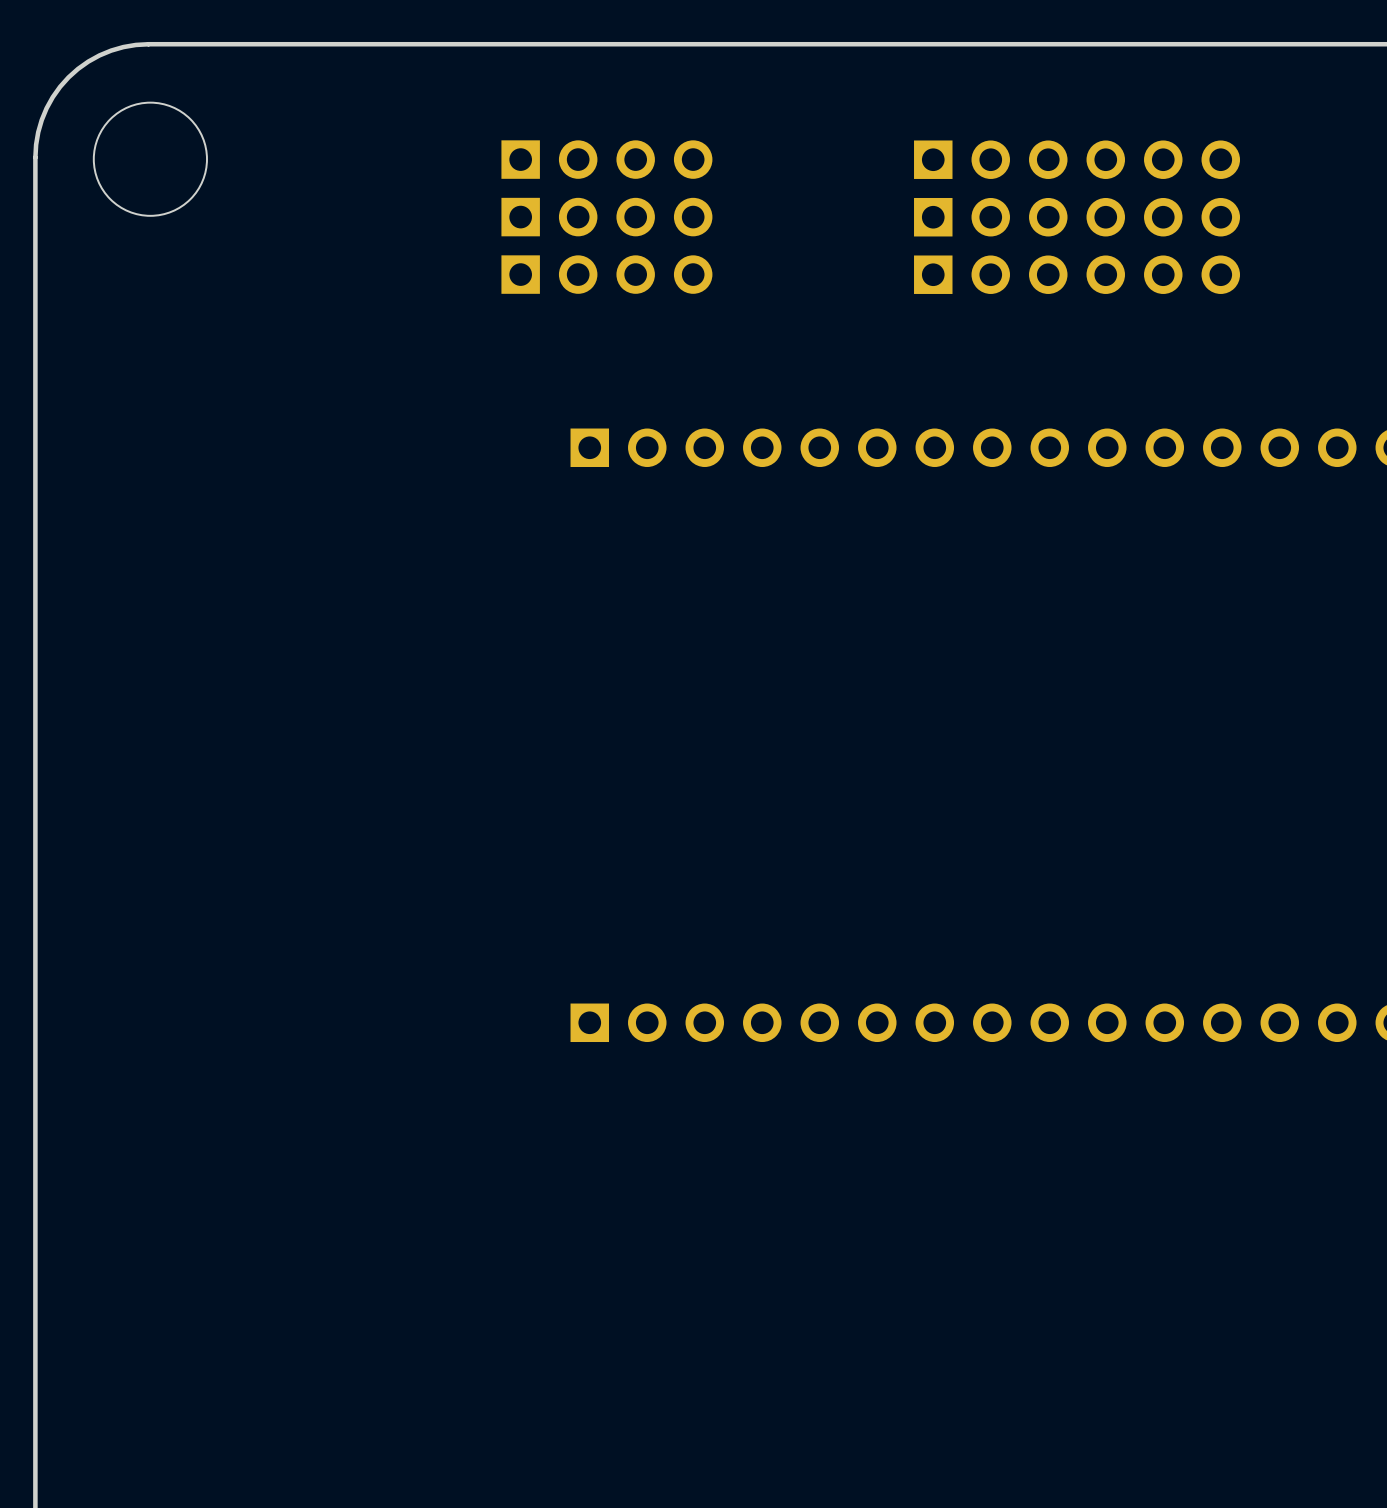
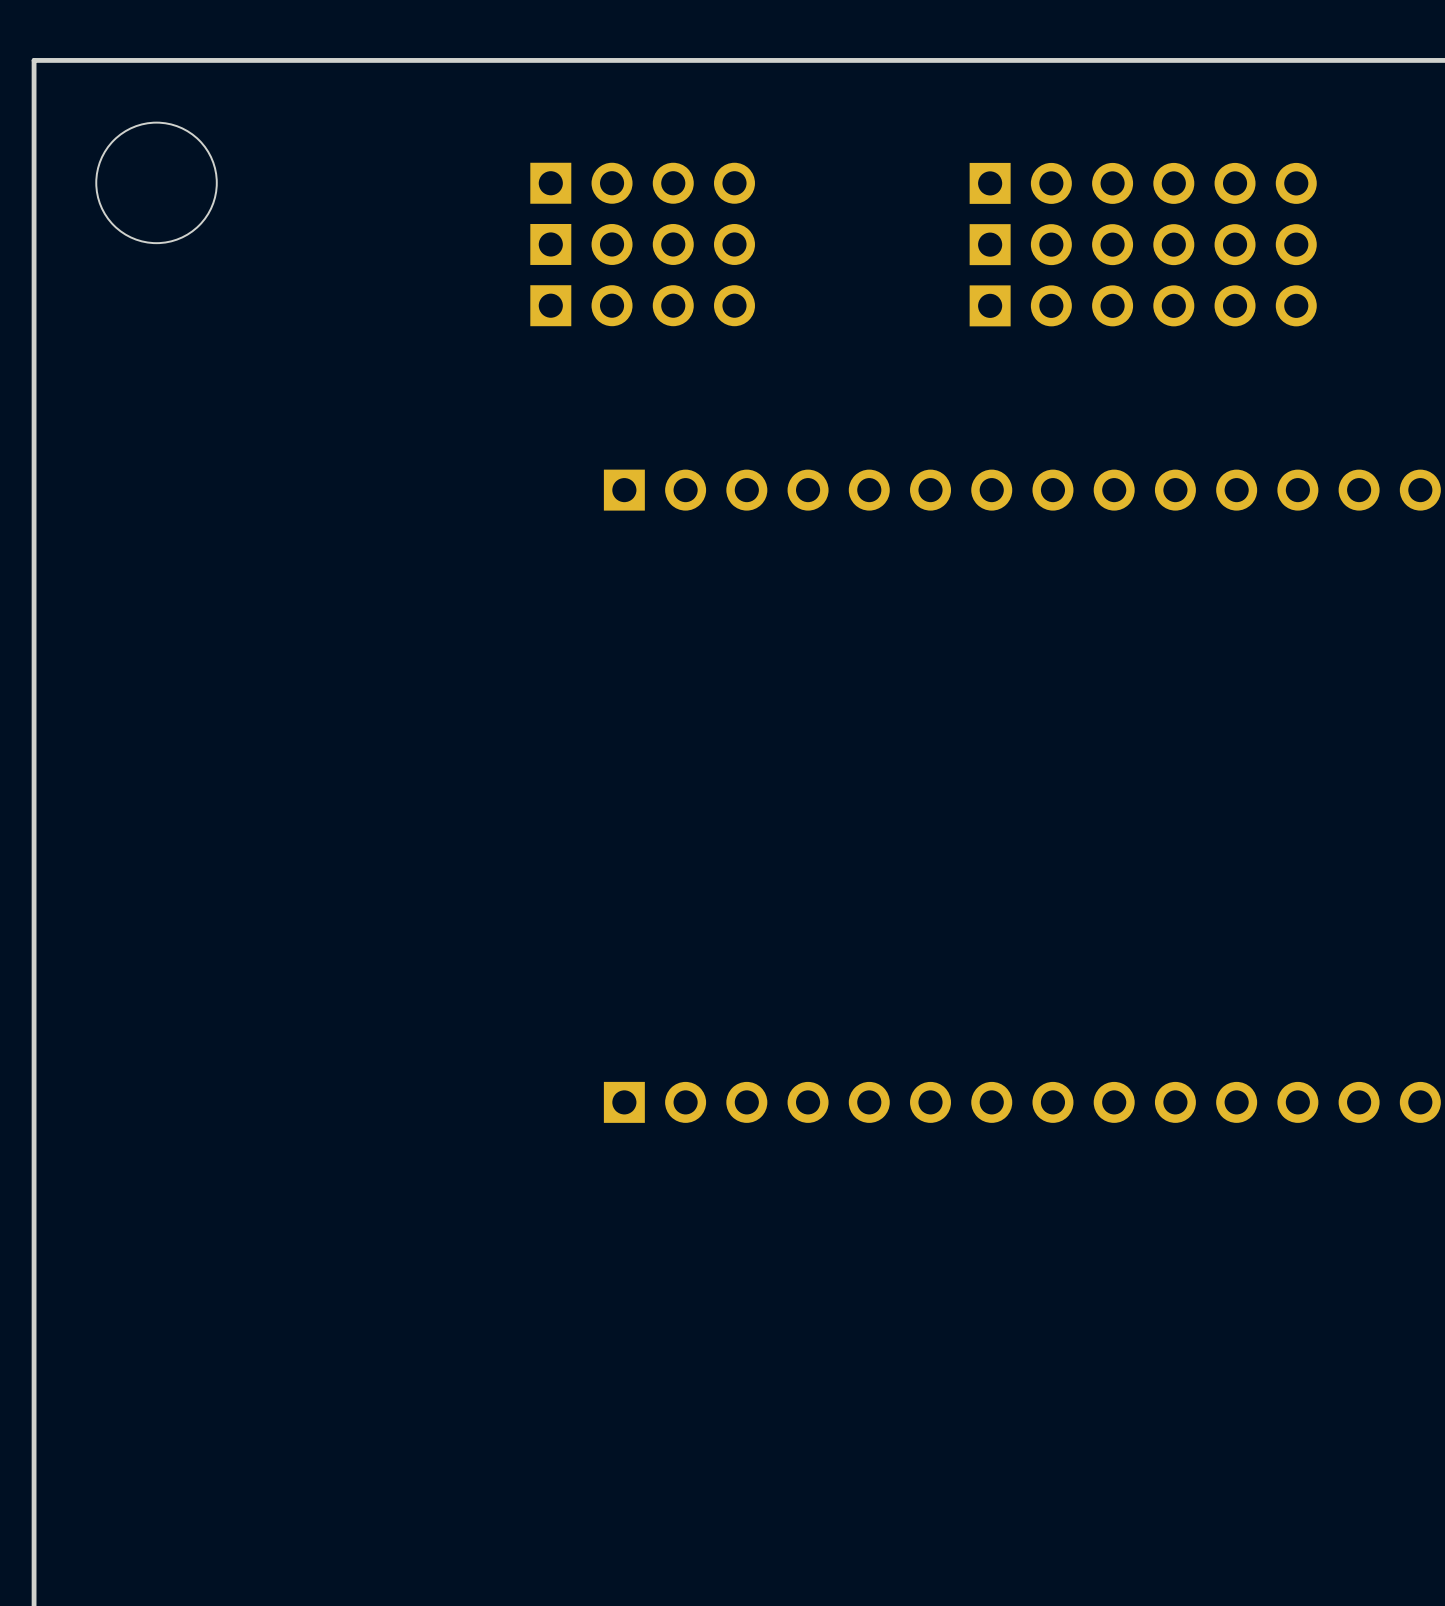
board edge: (148, 44) (111, 50) (88, 61) (68, 77) (52, 97) (41, 120) (35, 157) -> (154, 60) (34, 60) (34, 180)

